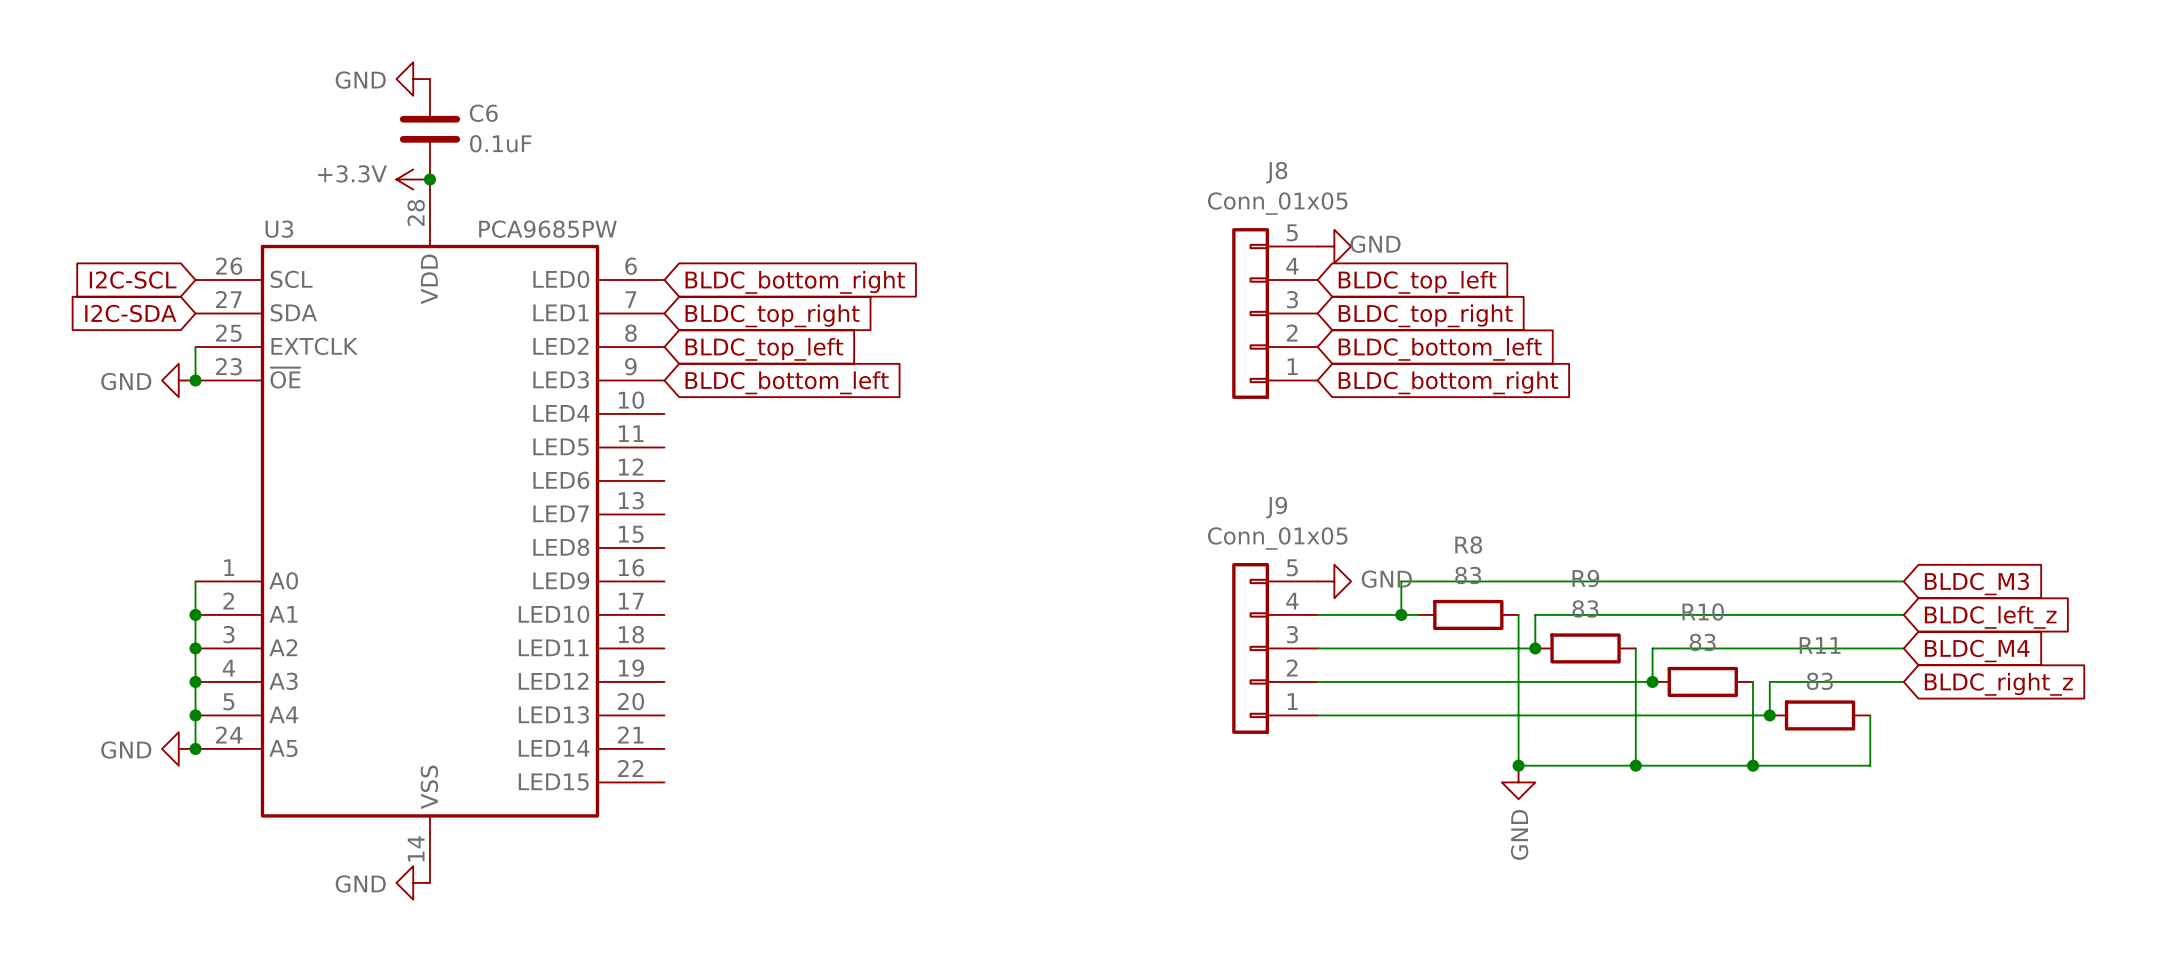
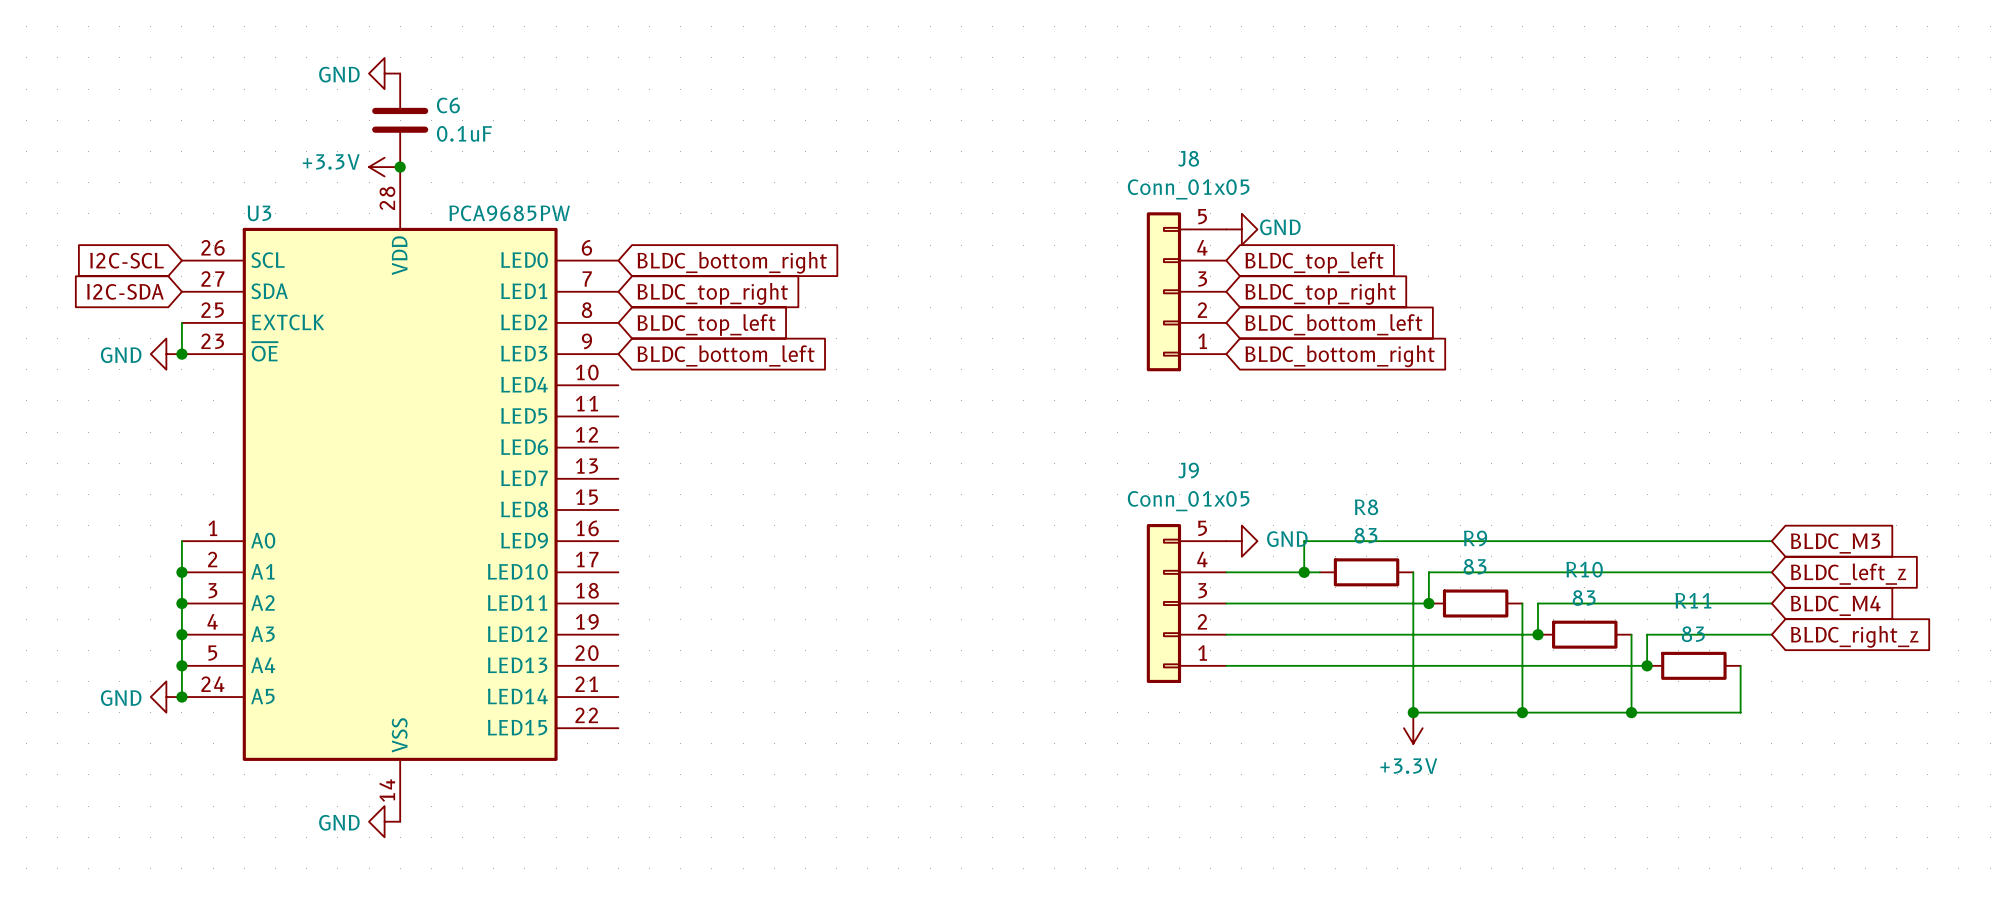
power symbol: GND (1518, 782) -> +3.3V (1413, 728)

